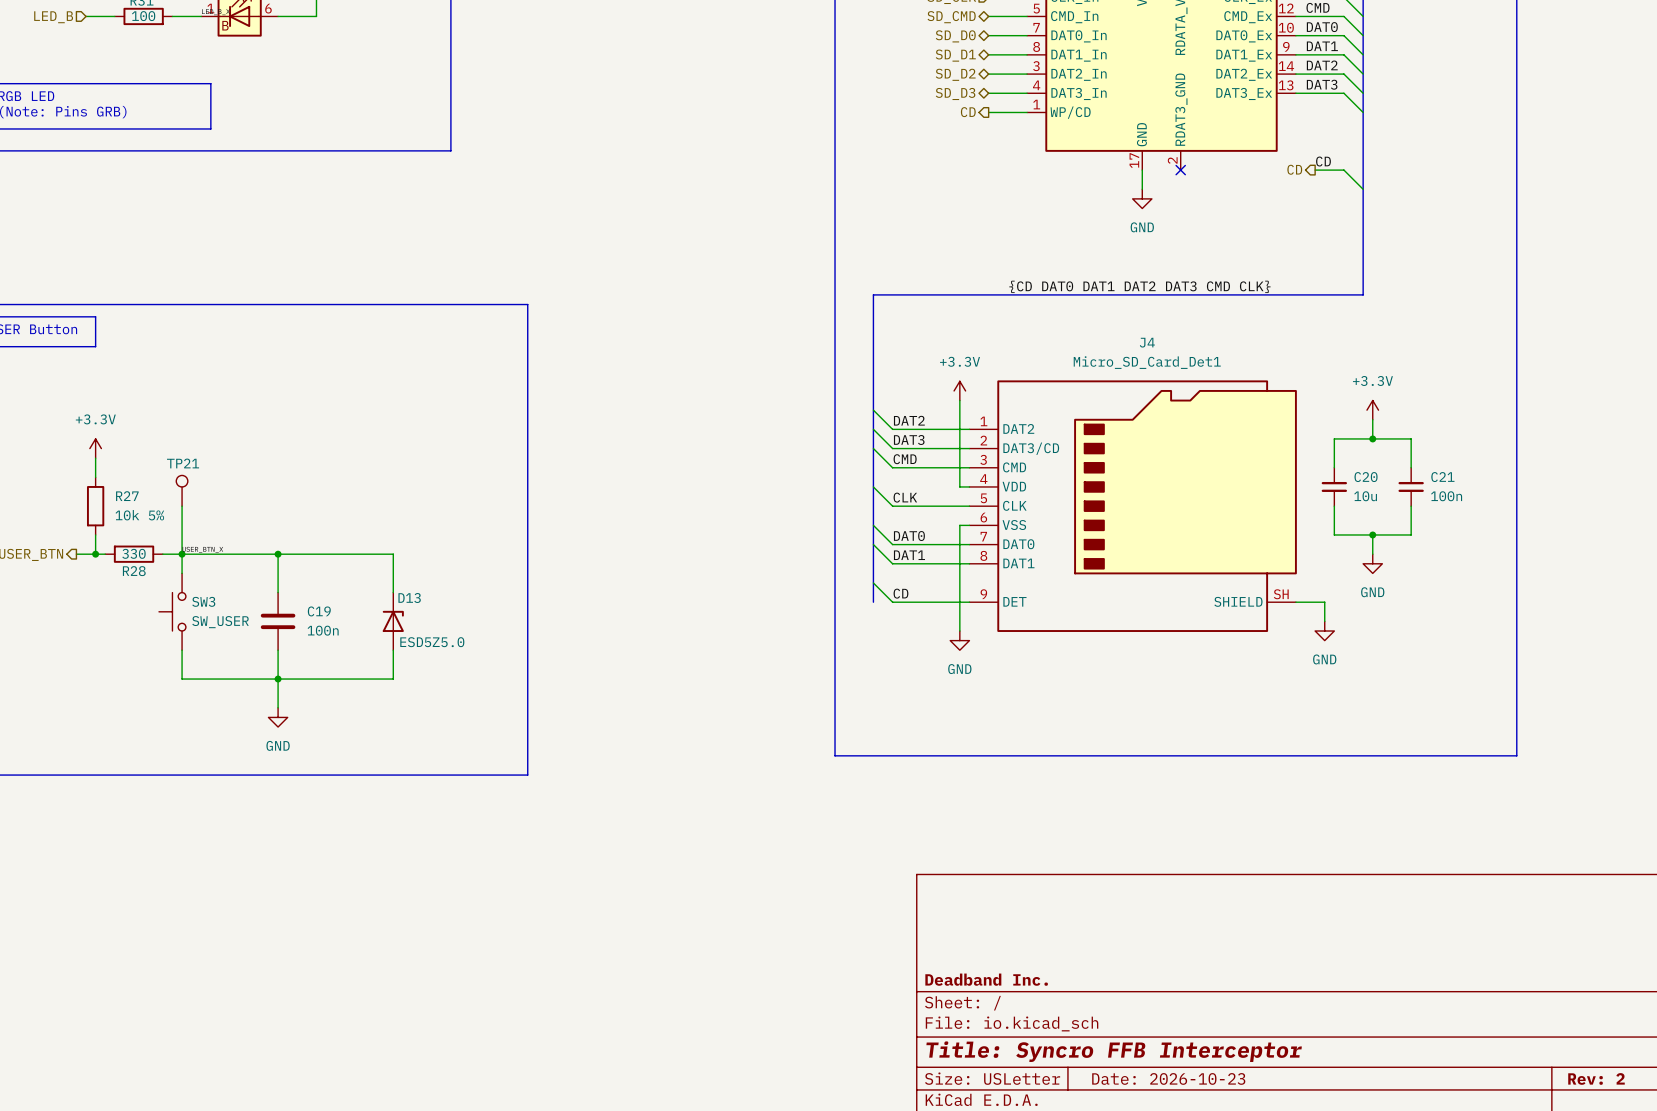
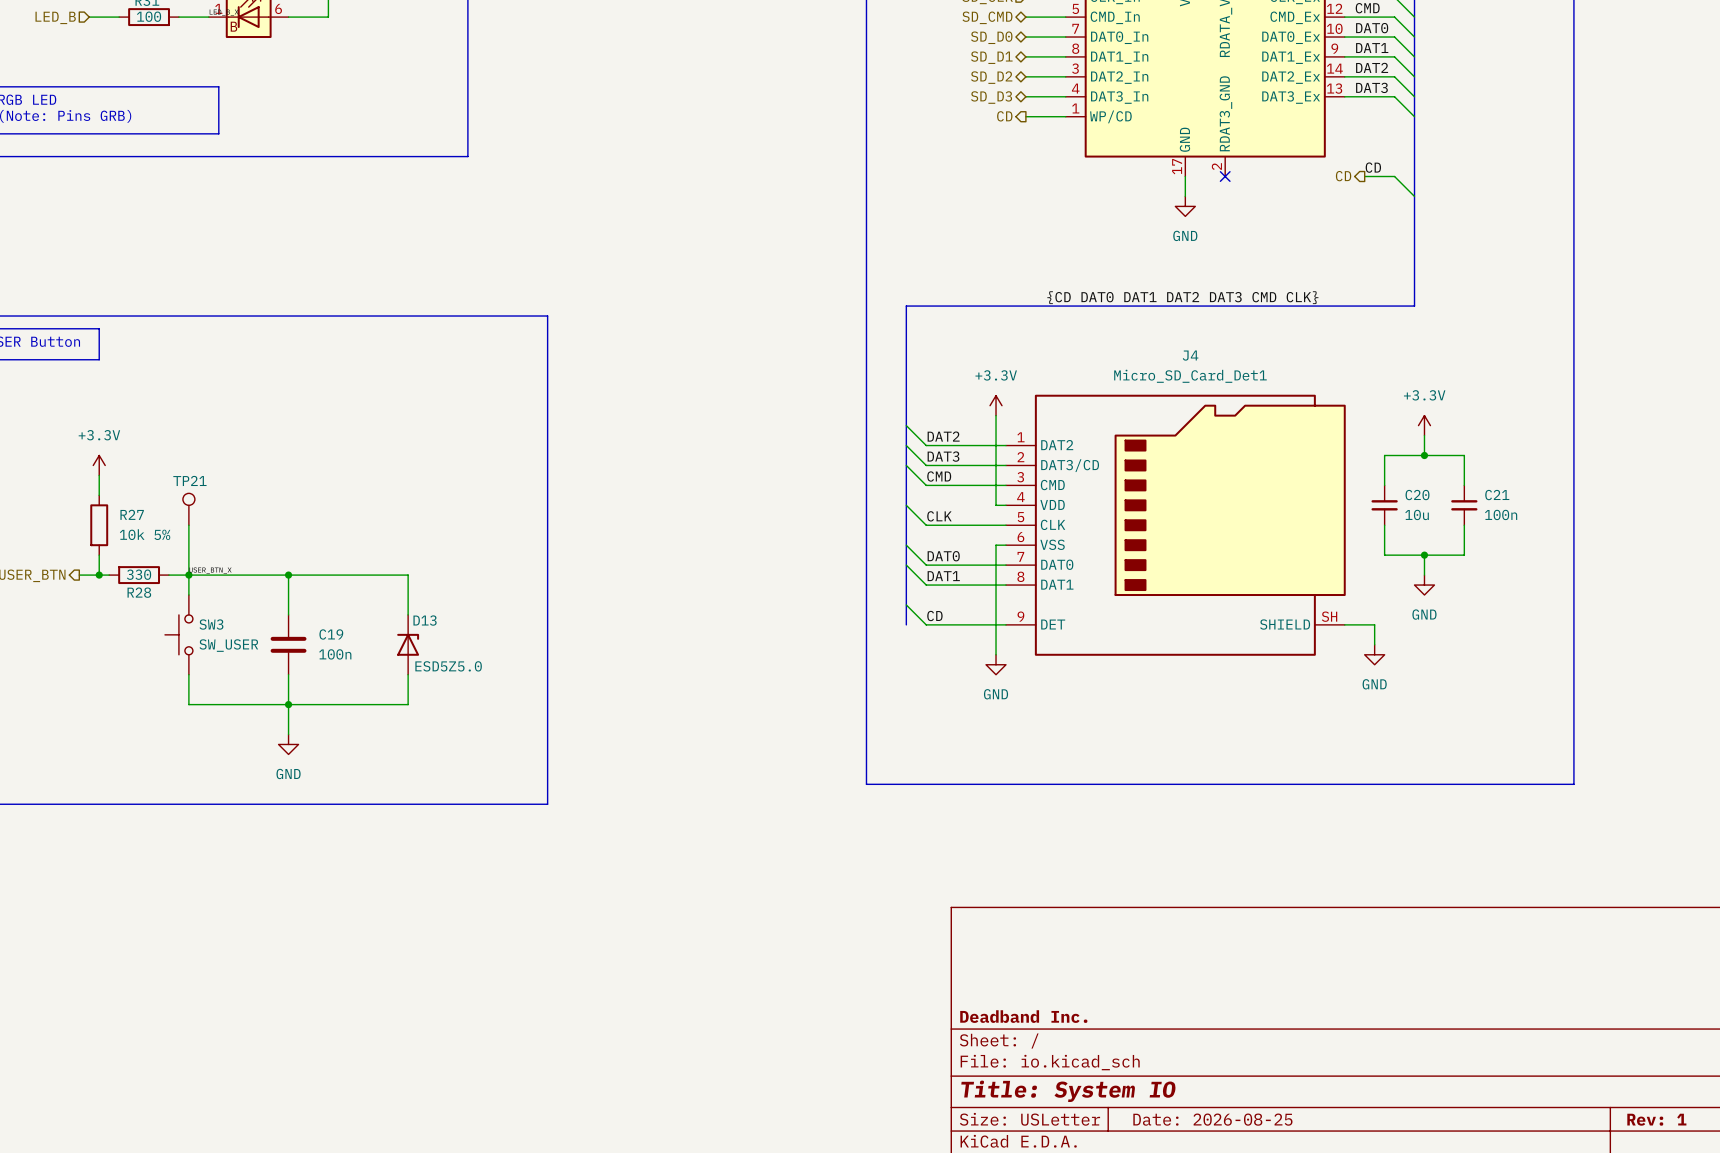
title block: Title: Syncro FFB Interceptor (1114, 1051) -> Title: System IO (1068, 1091)
title block: Date: 2026-10-23 (1168, 1078) -> Date: 2026-08-25 (1212, 1119)
title block: Rev: 2 (1596, 1078) -> Rev: 1 (1656, 1119)

